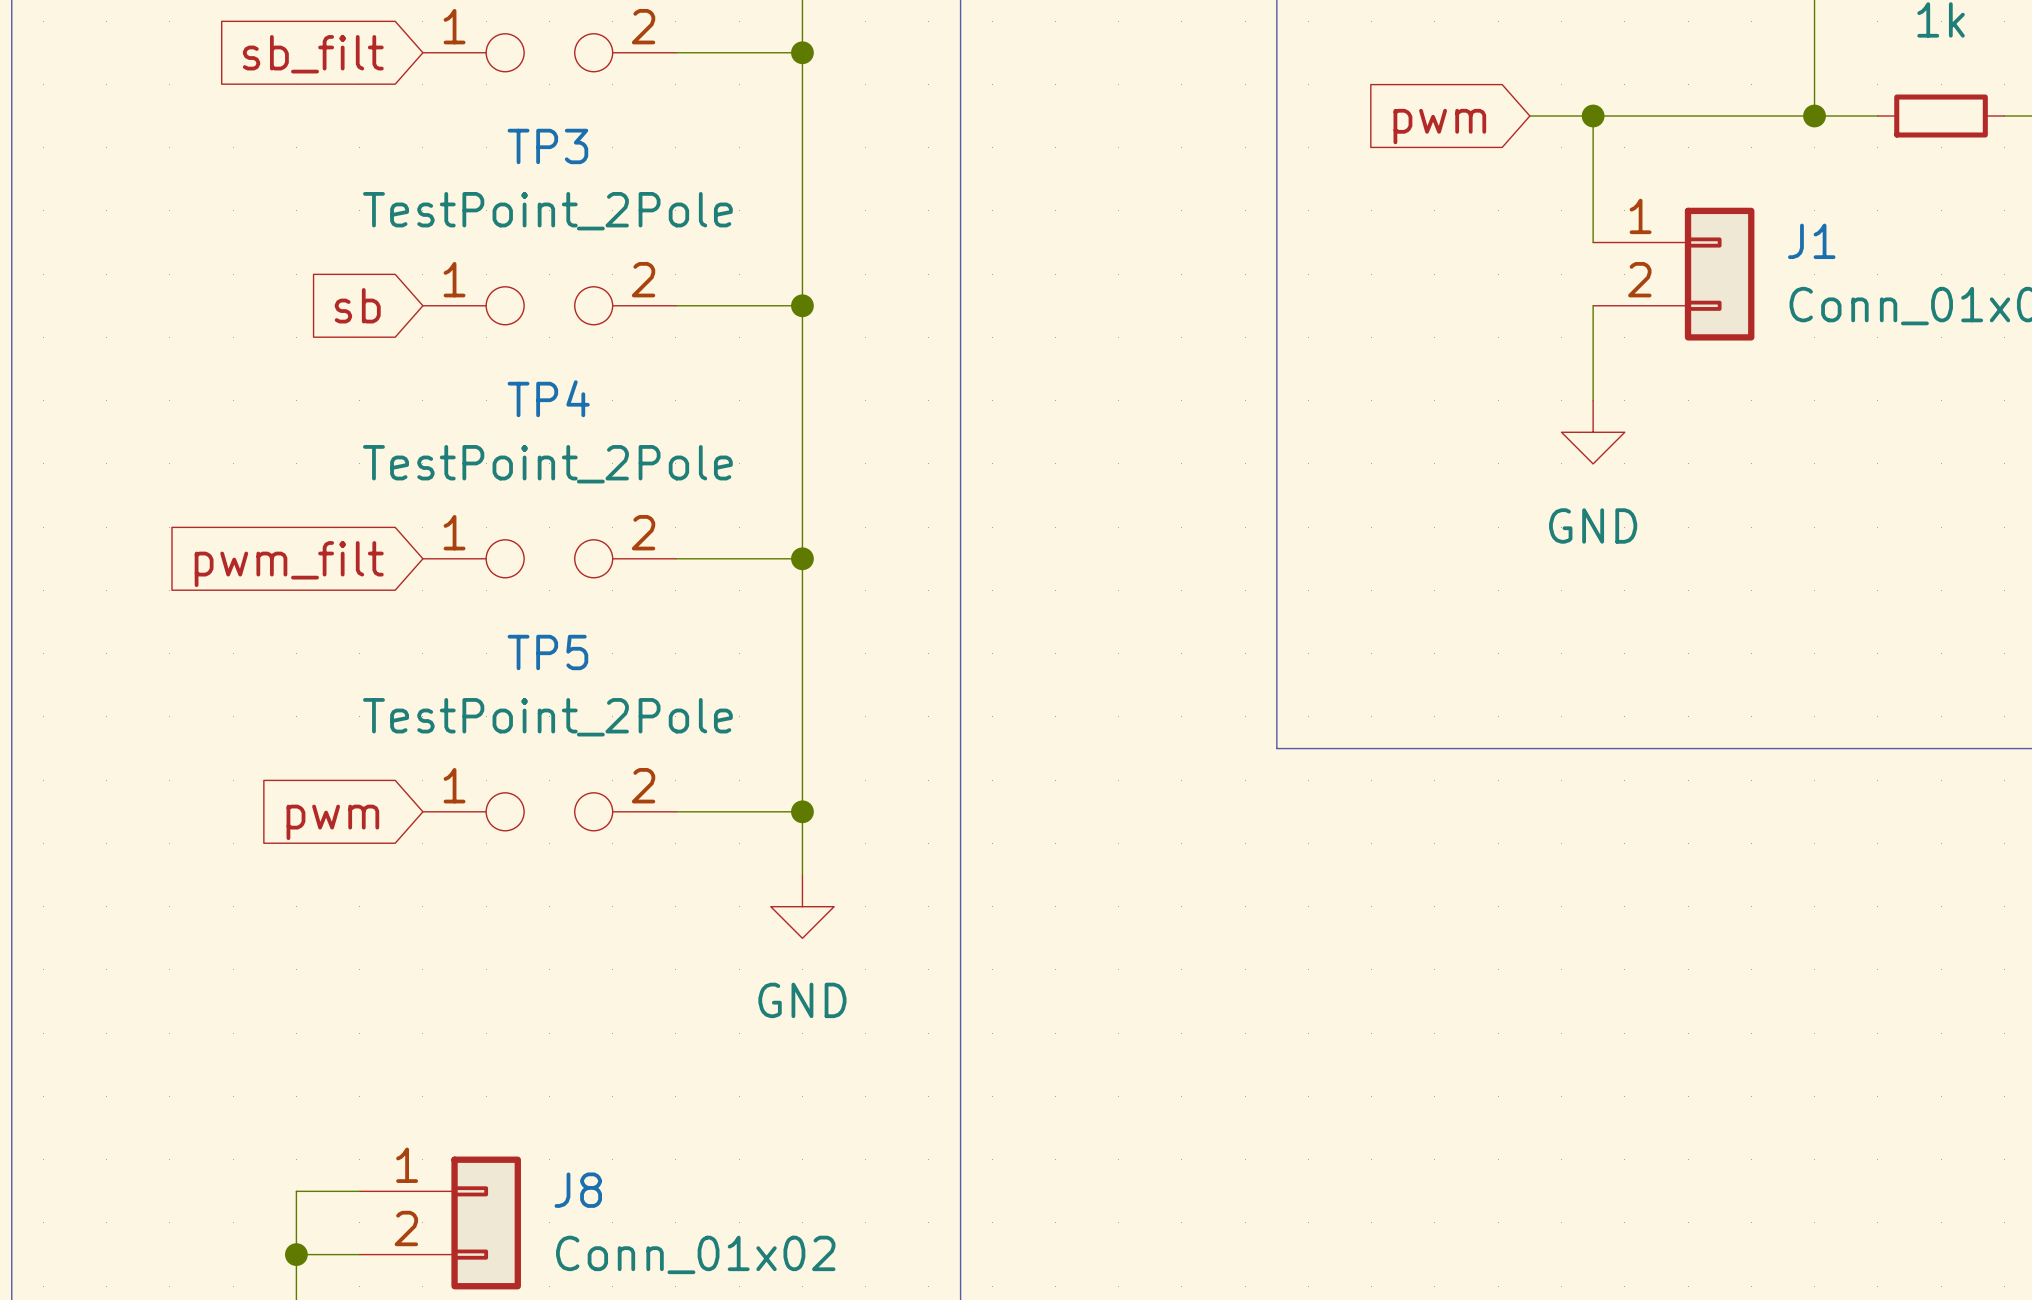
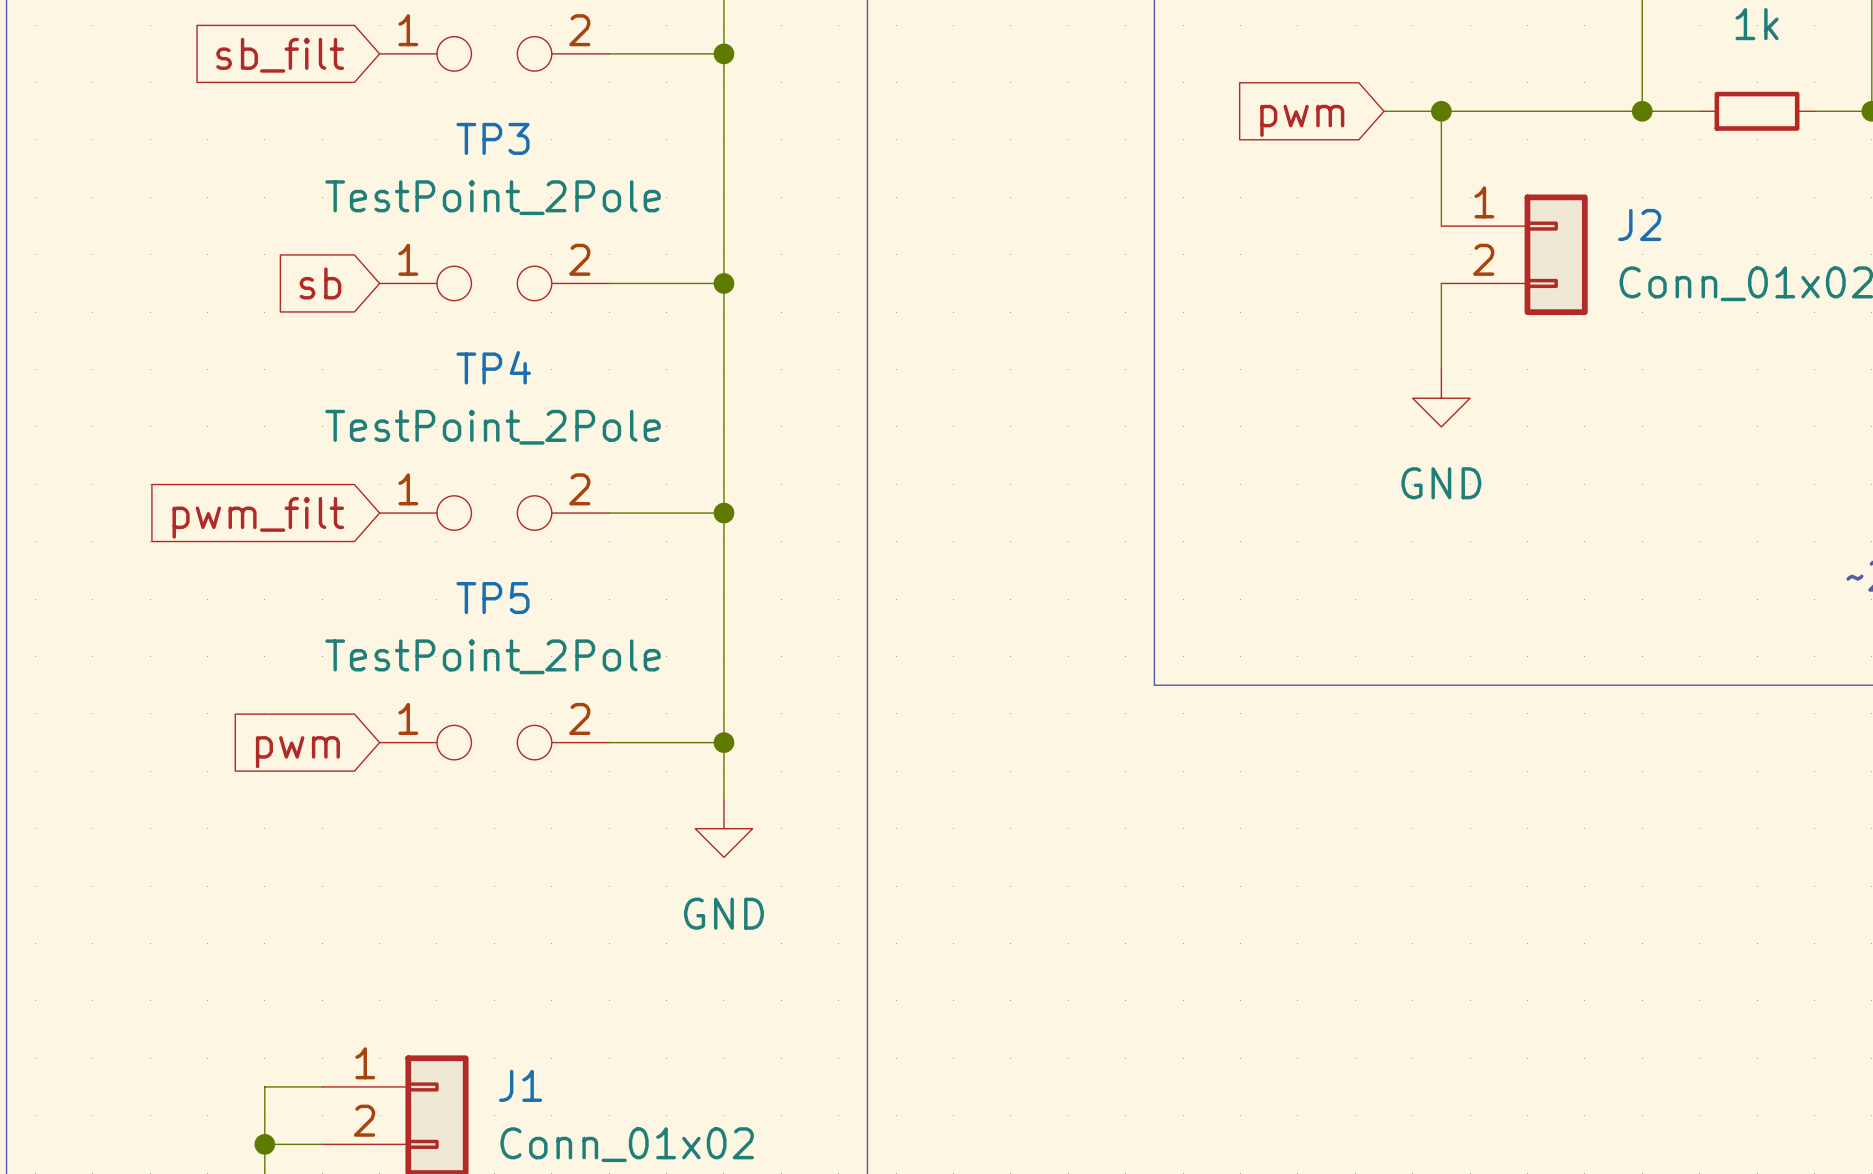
J1 name: J1 (1811, 241) -> J2 (1639, 224)
J8 name: J8 (578, 1190) -> J1 (520, 1085)

